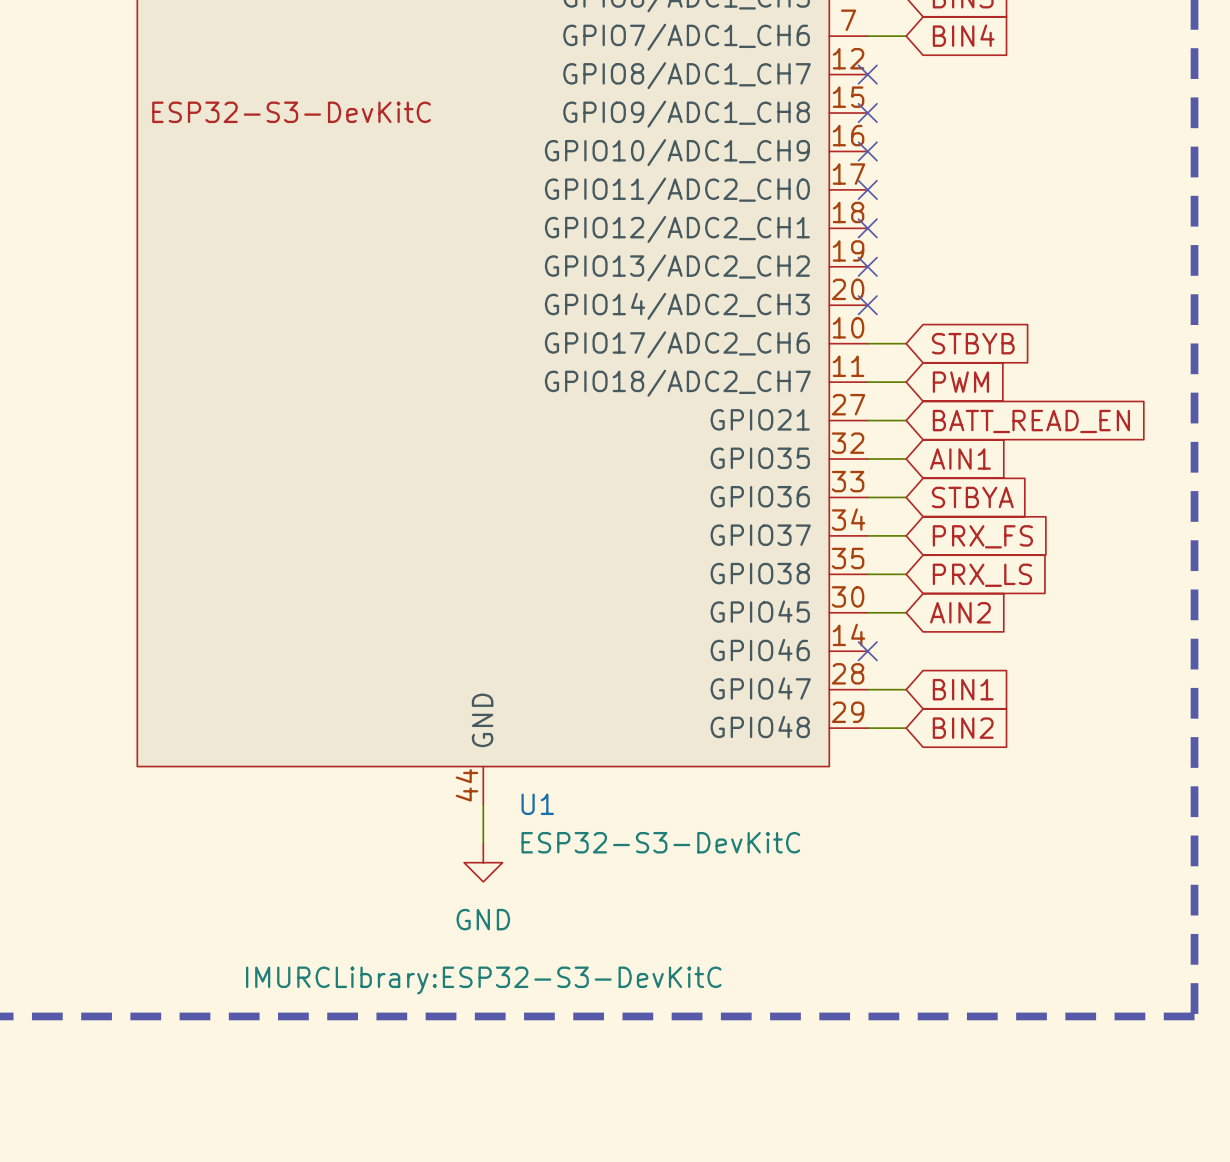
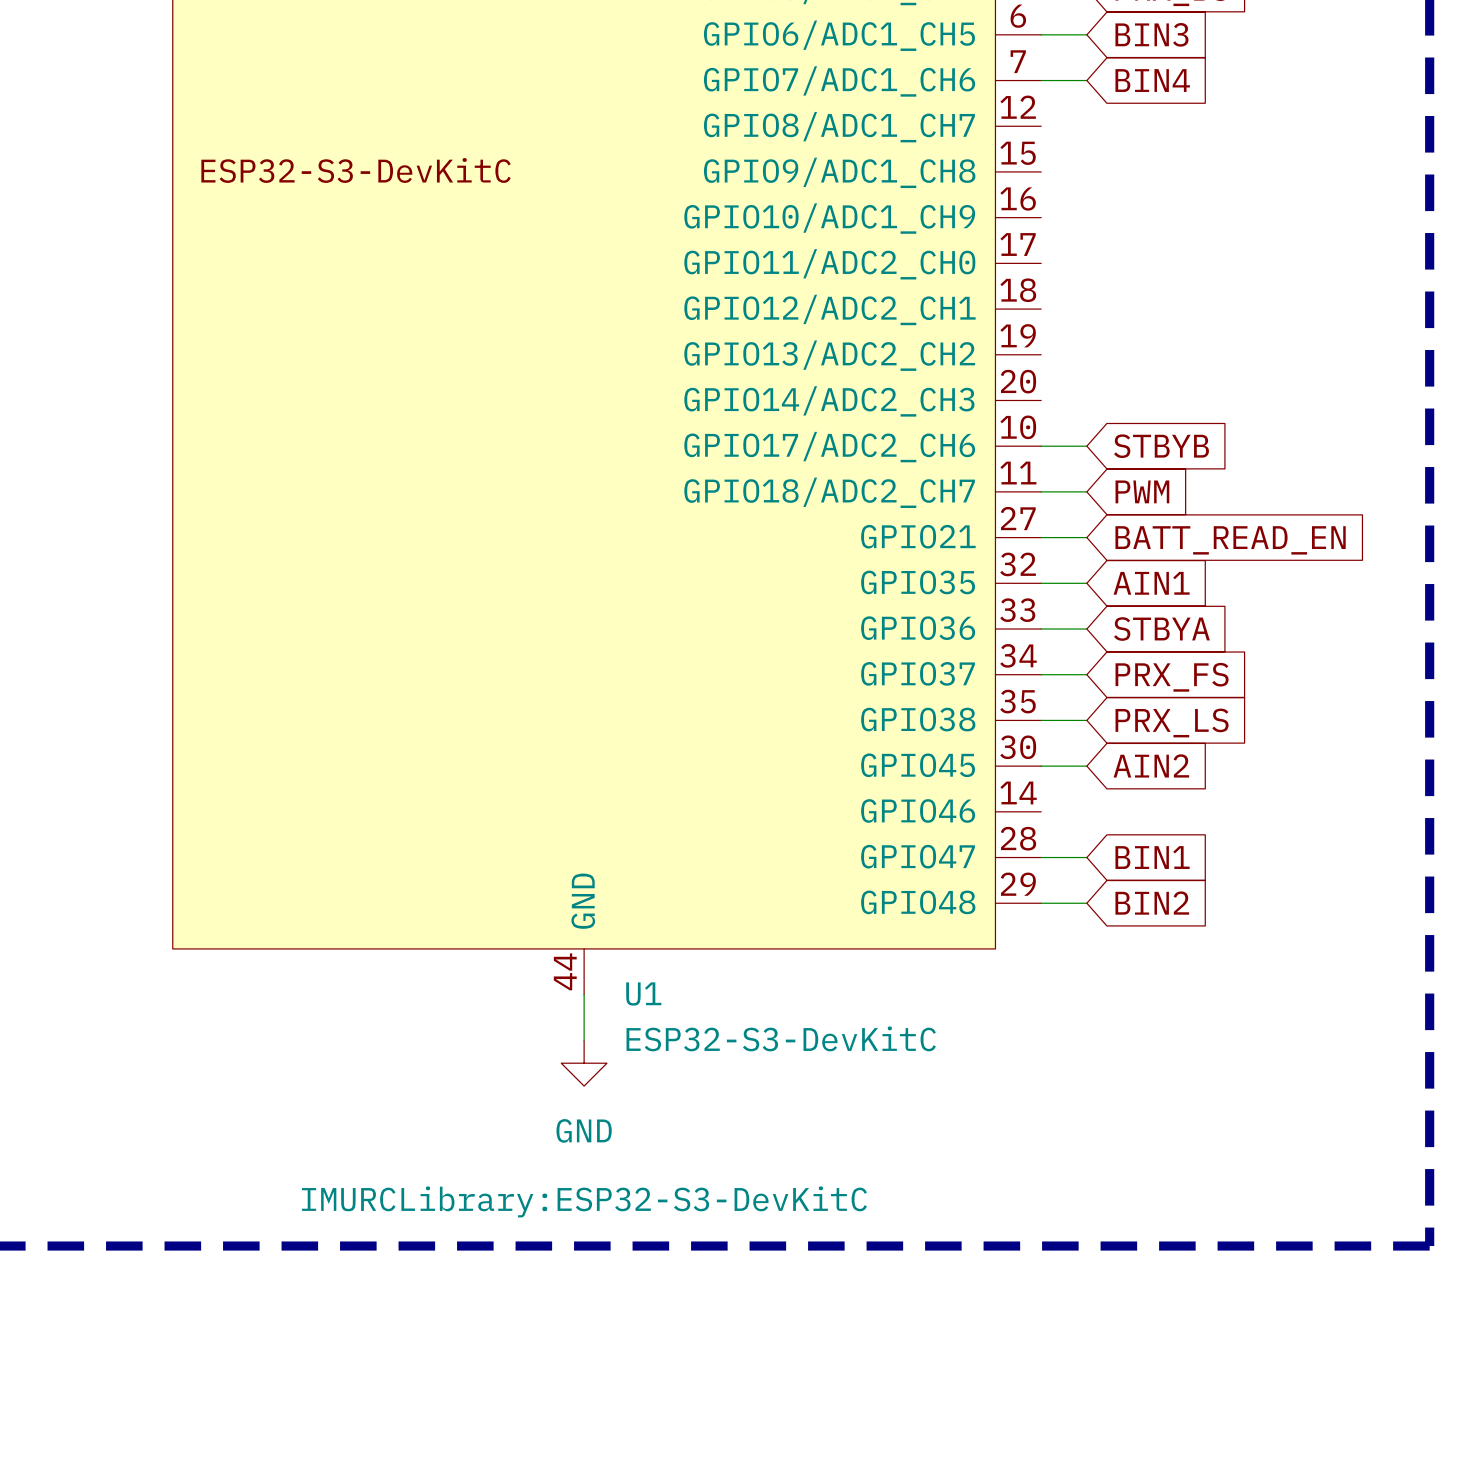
no-connect mark: (867, 74) -> none
no-connect mark: (867, 113) -> none
no-connect mark: (867, 151) -> none
no-connect mark: (867, 189) -> none
no-connect mark: (867, 228) -> none
no-connect mark: (867, 266) -> none
no-connect mark: (867, 305) -> none
no-connect mark: (867, 651) -> none

